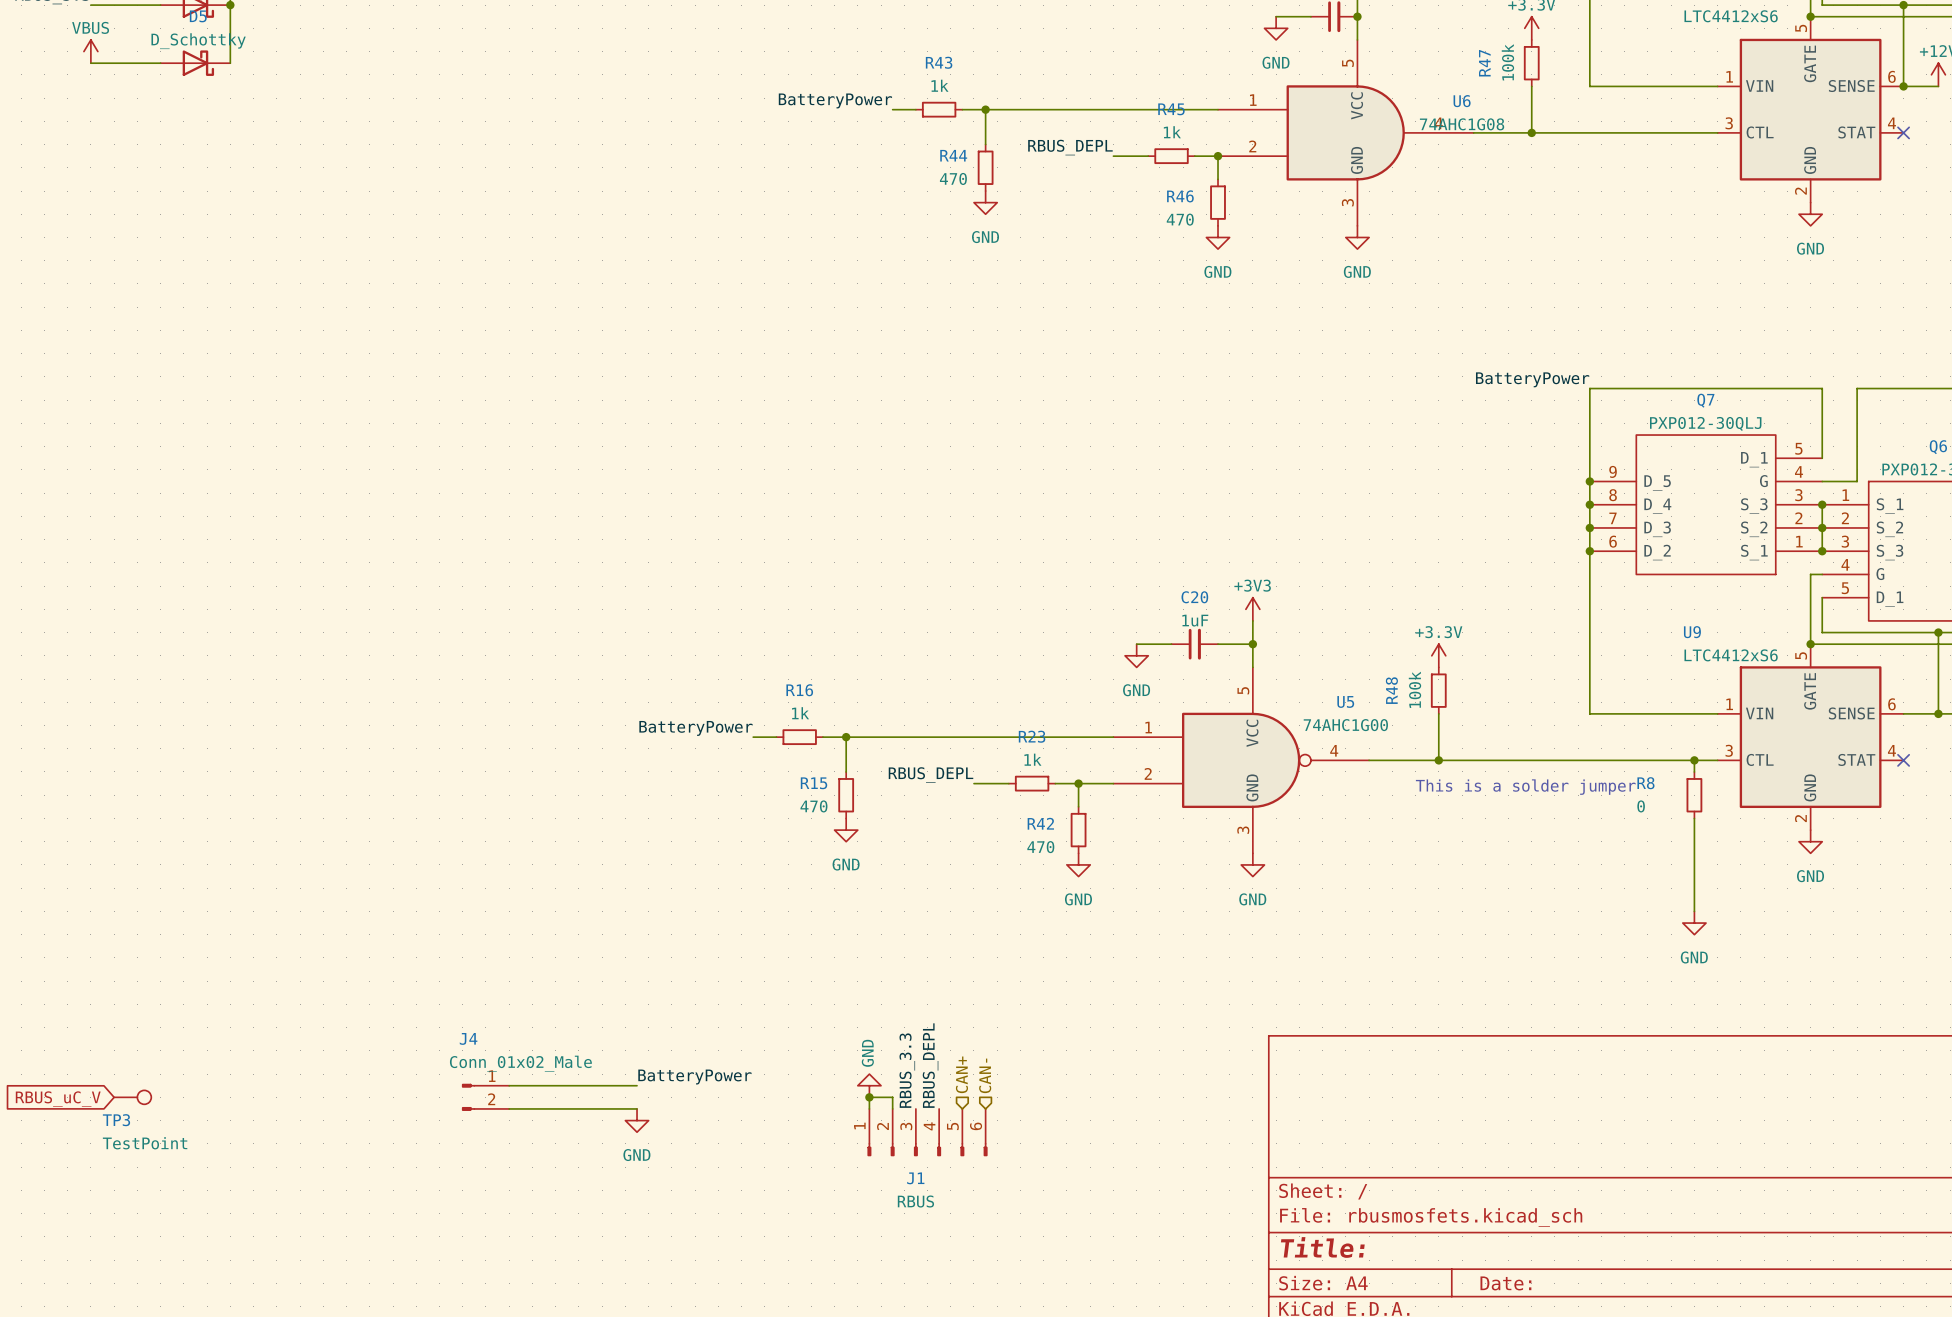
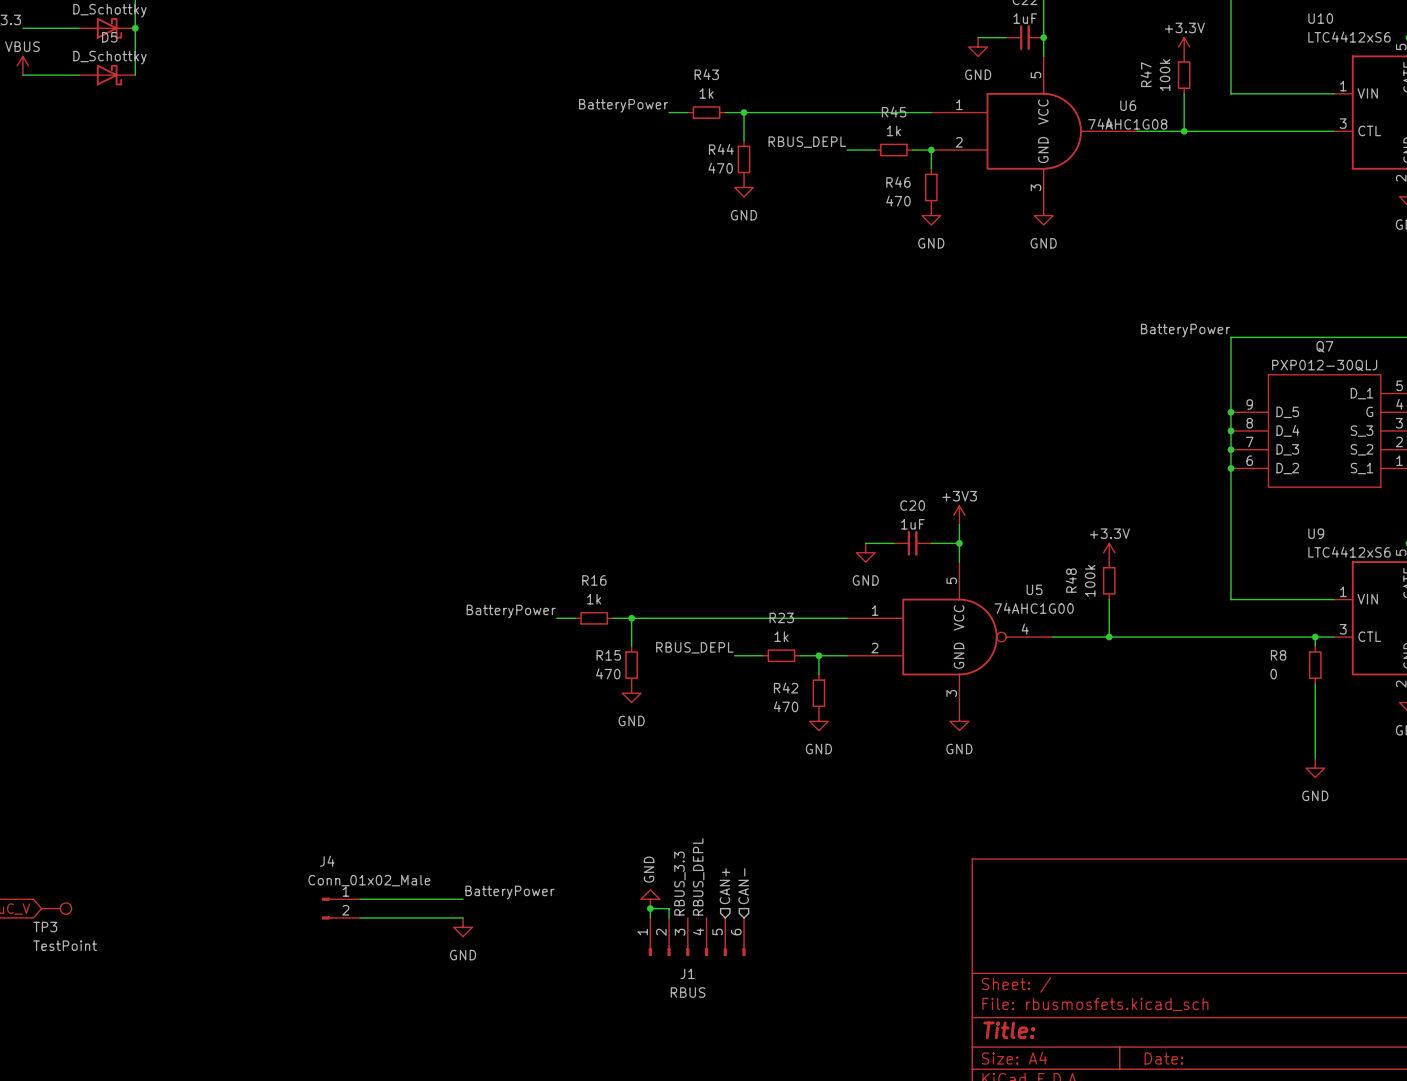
text: This is a solder jumper (1525, 787) -> none

